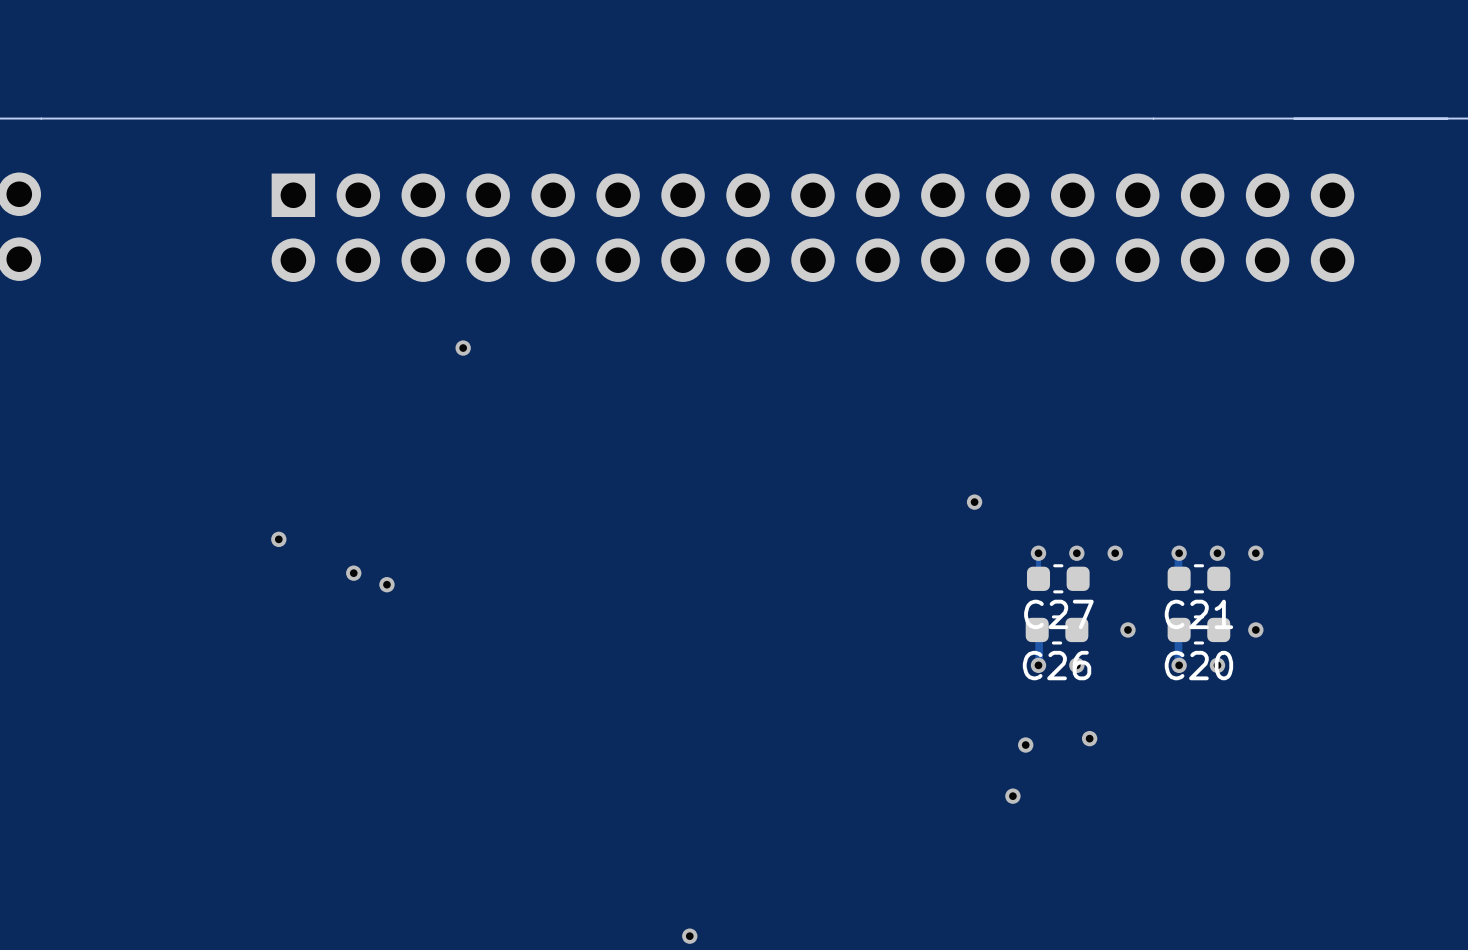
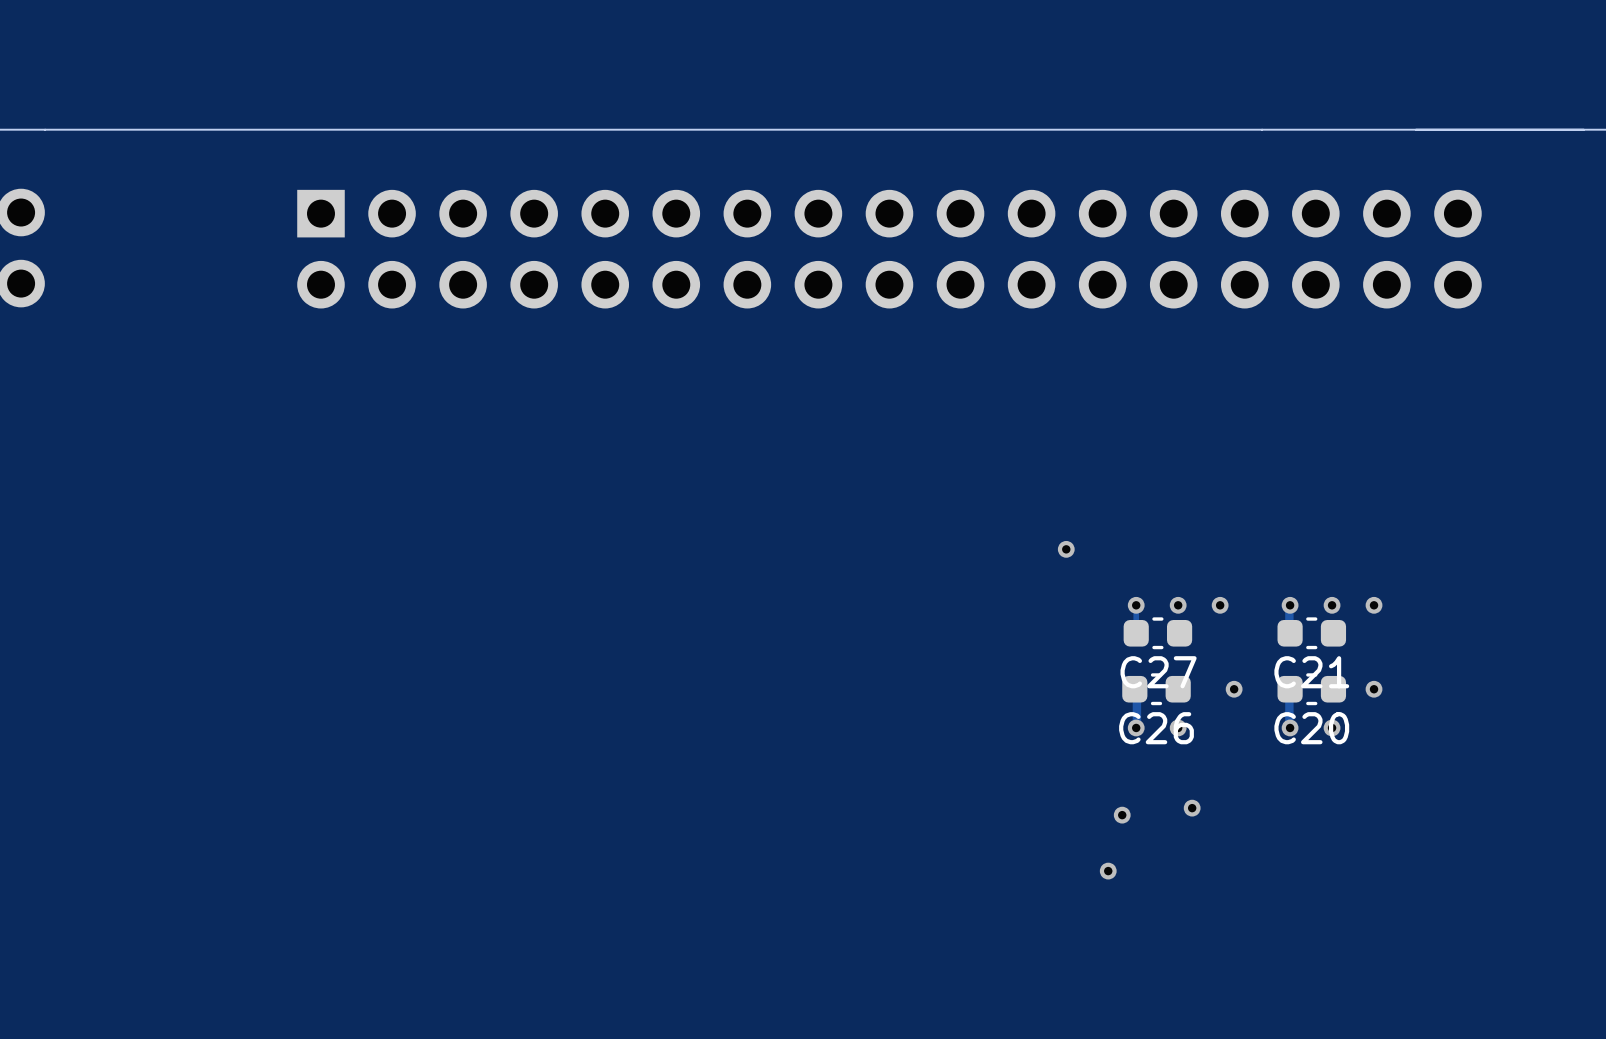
via: (463, 348) -> none
via: (278, 539) -> none
via: (353, 573) -> none
via: (386, 584) -> none
via: (689, 936) -> none

